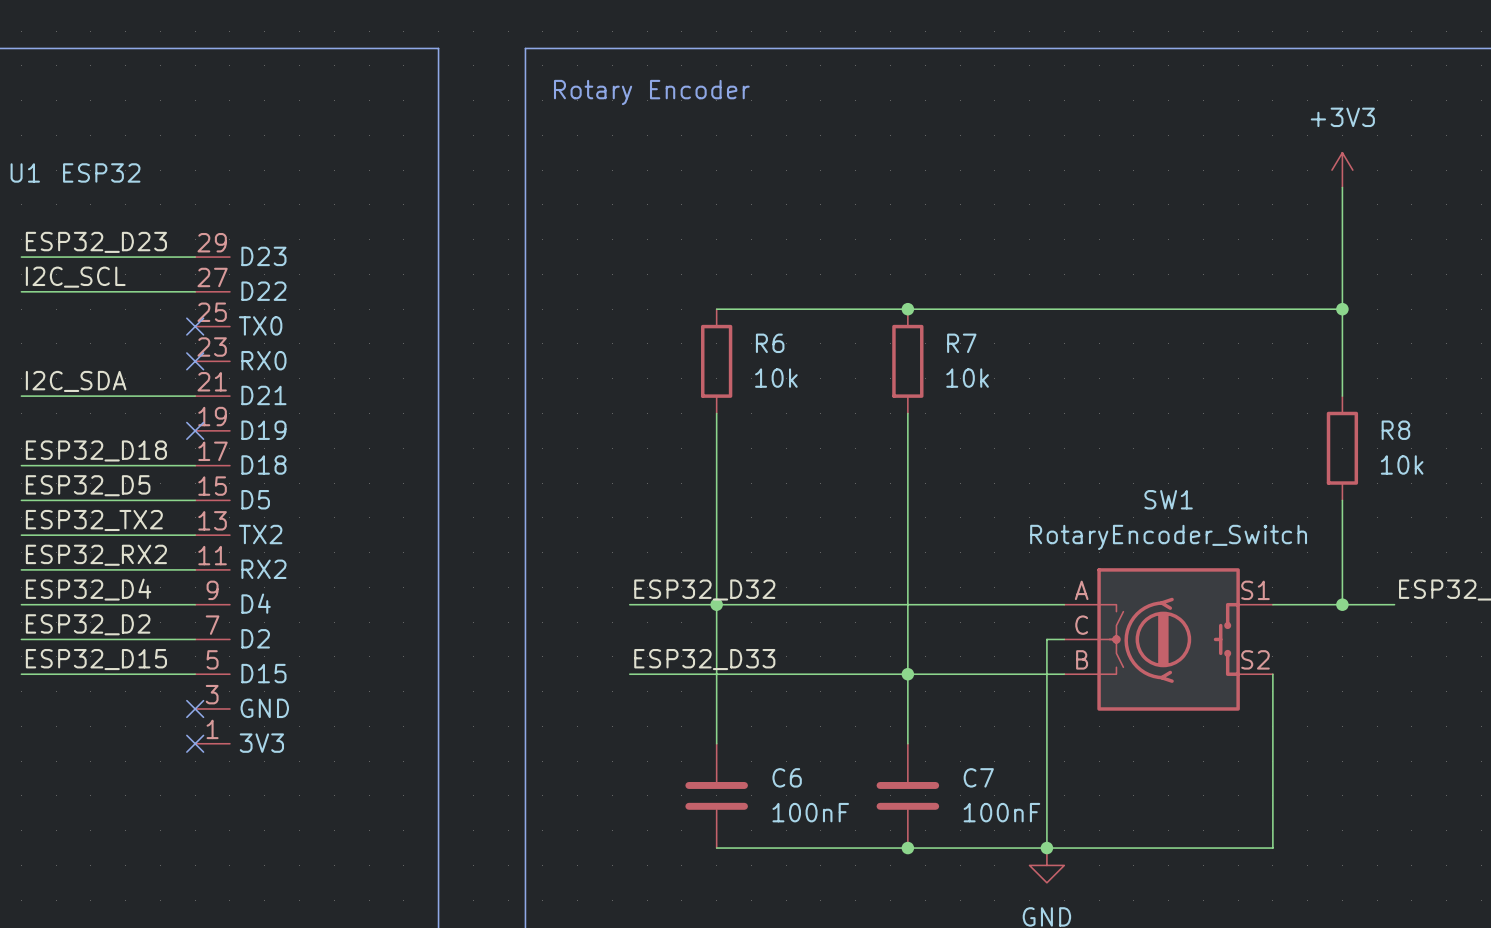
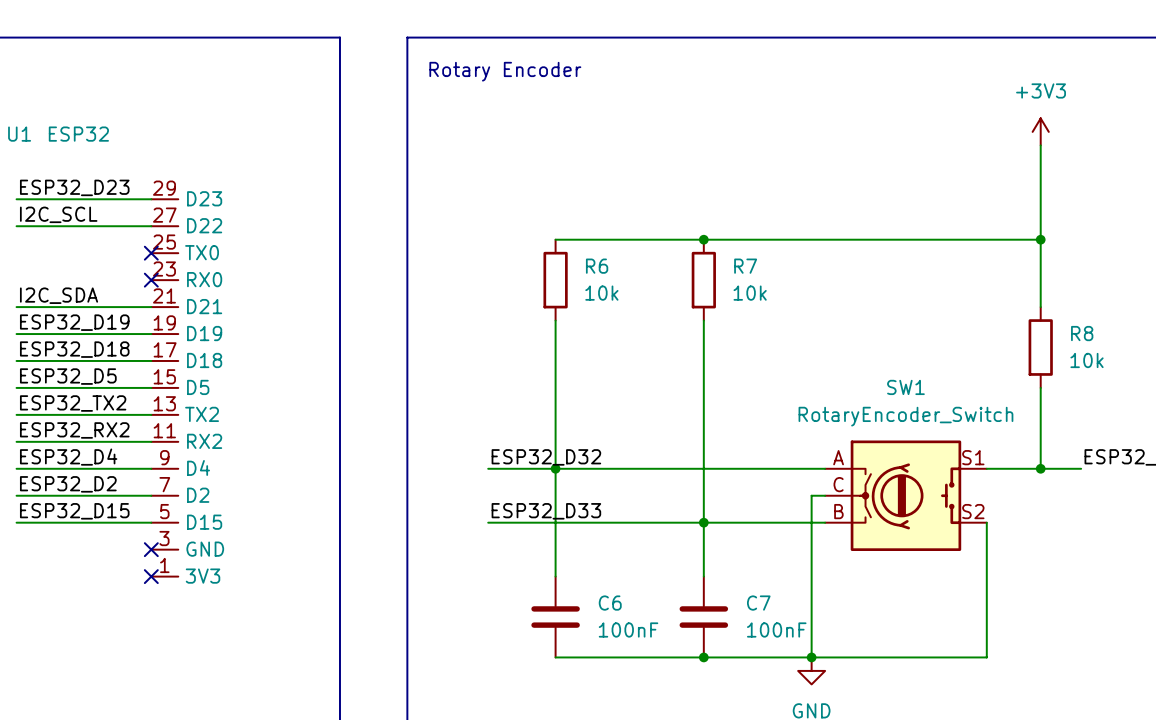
label: none -> ESP32_D19 (74, 322)
wire: none -> (16, 334) (151, 334)
no-connect mark: (195, 430) -> none

